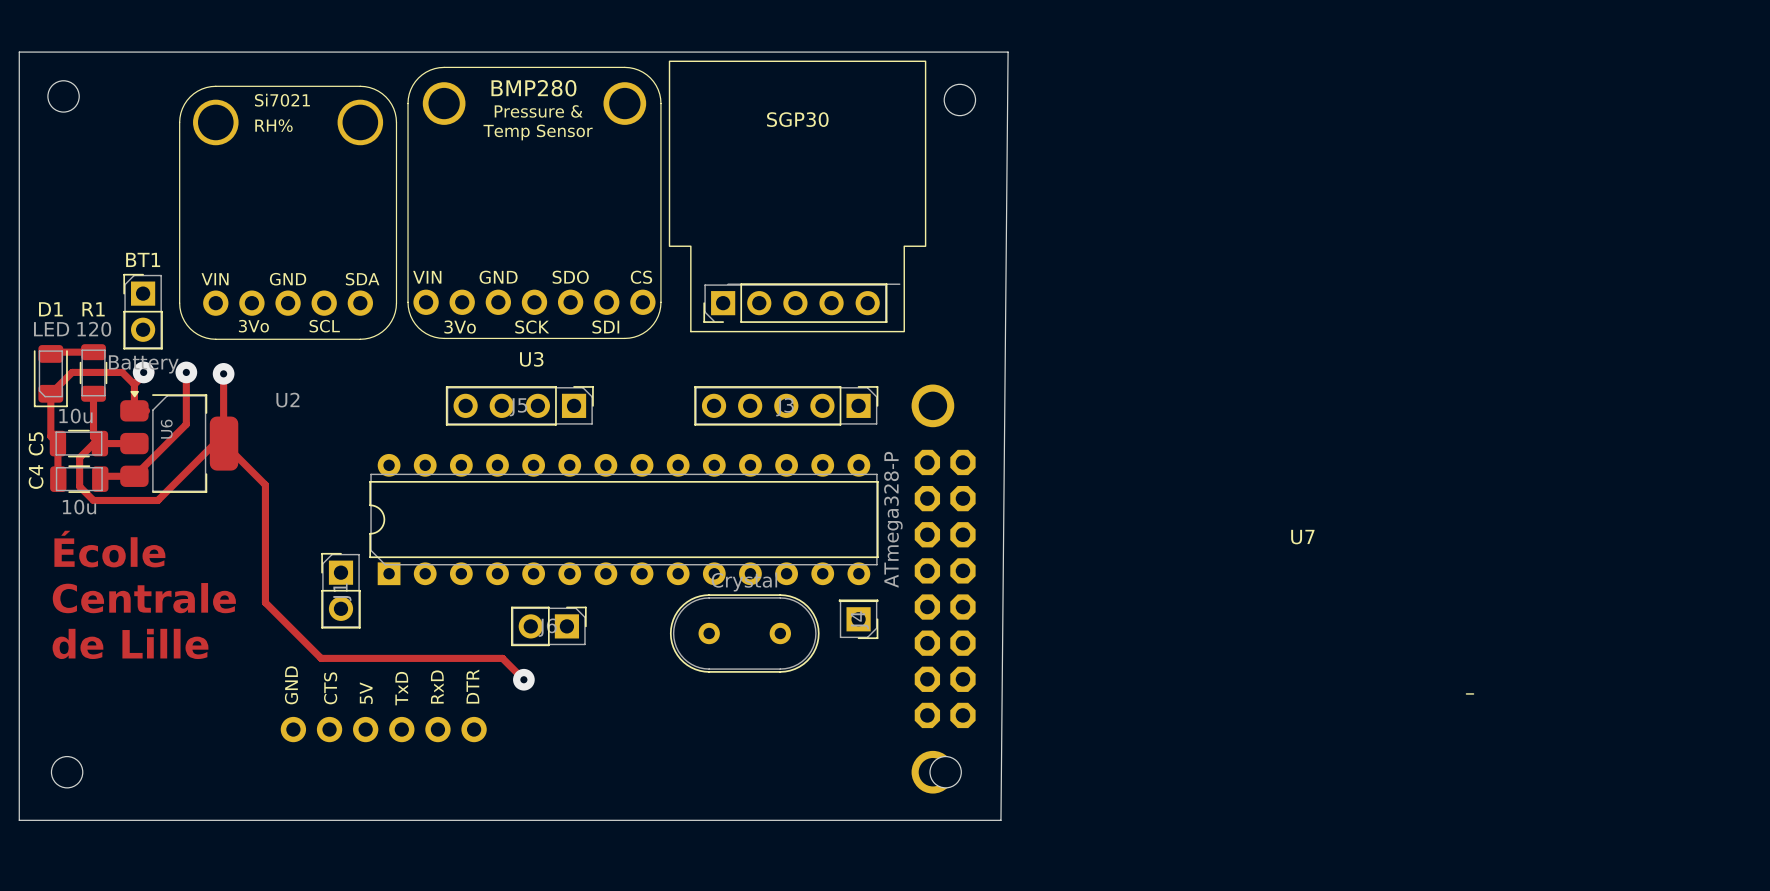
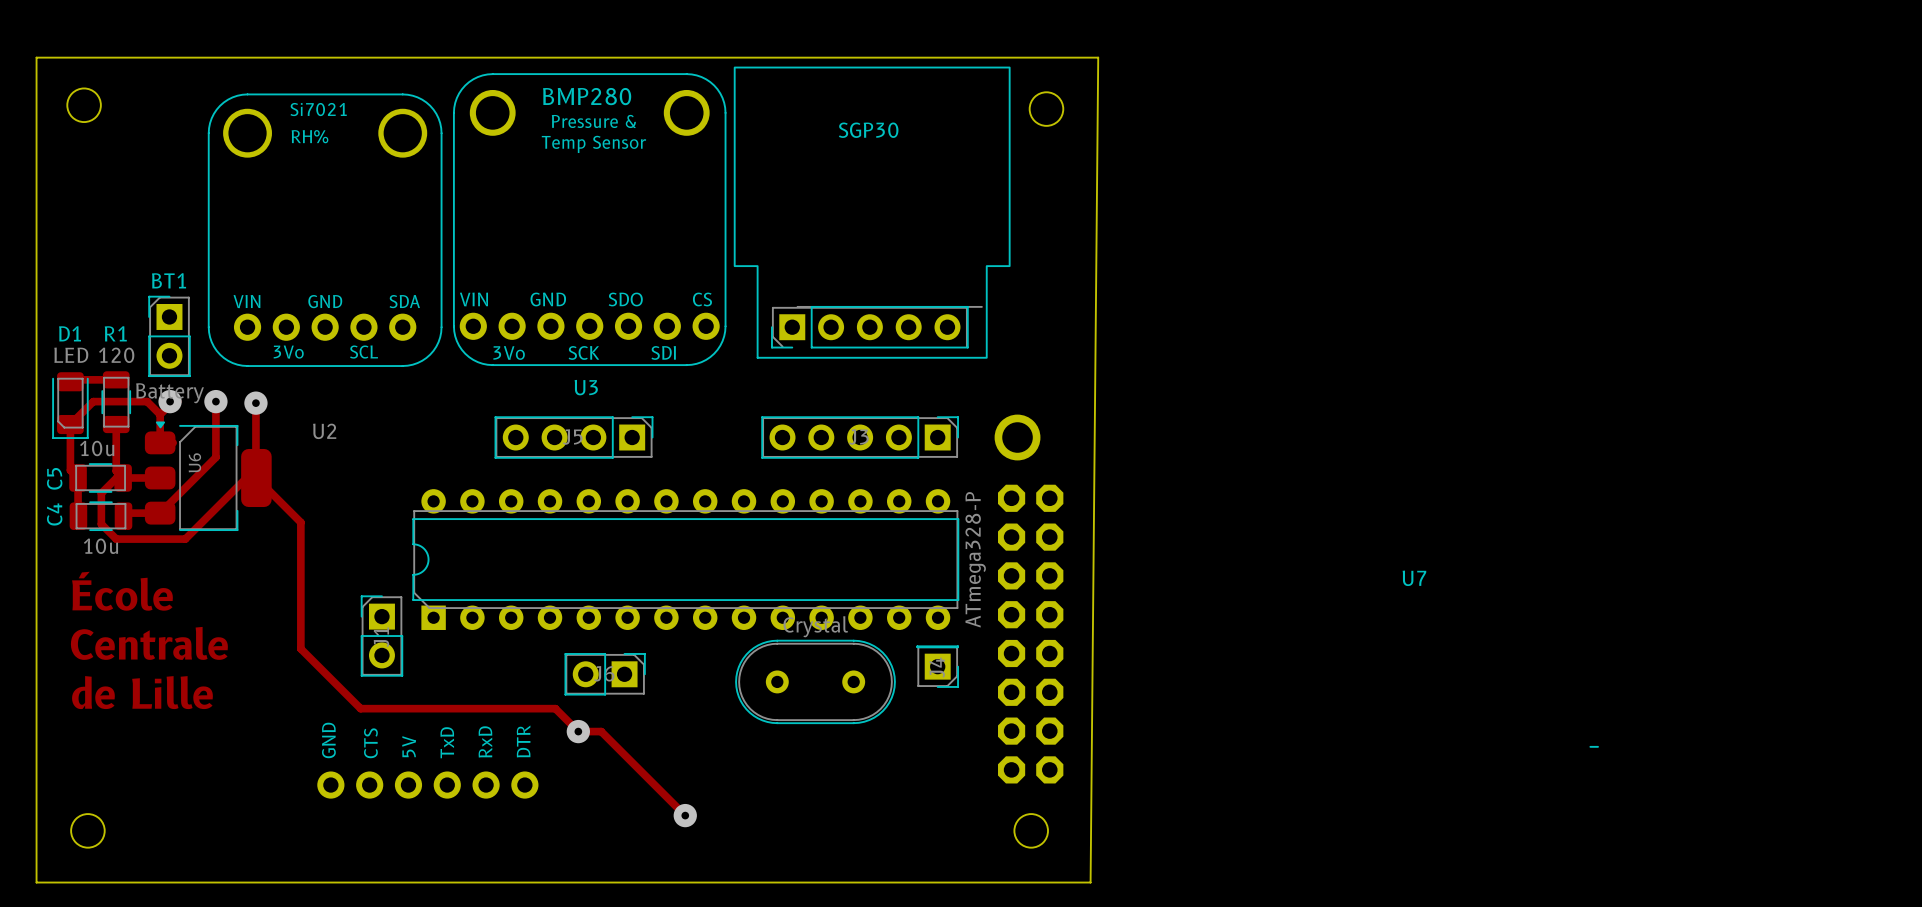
U7 footprint: [911, 384, 1475, 794] -> [994, 414, 1599, 784]
track: none -> (578, 731) (601, 731) (685, 815)
via: none -> (685, 815)

